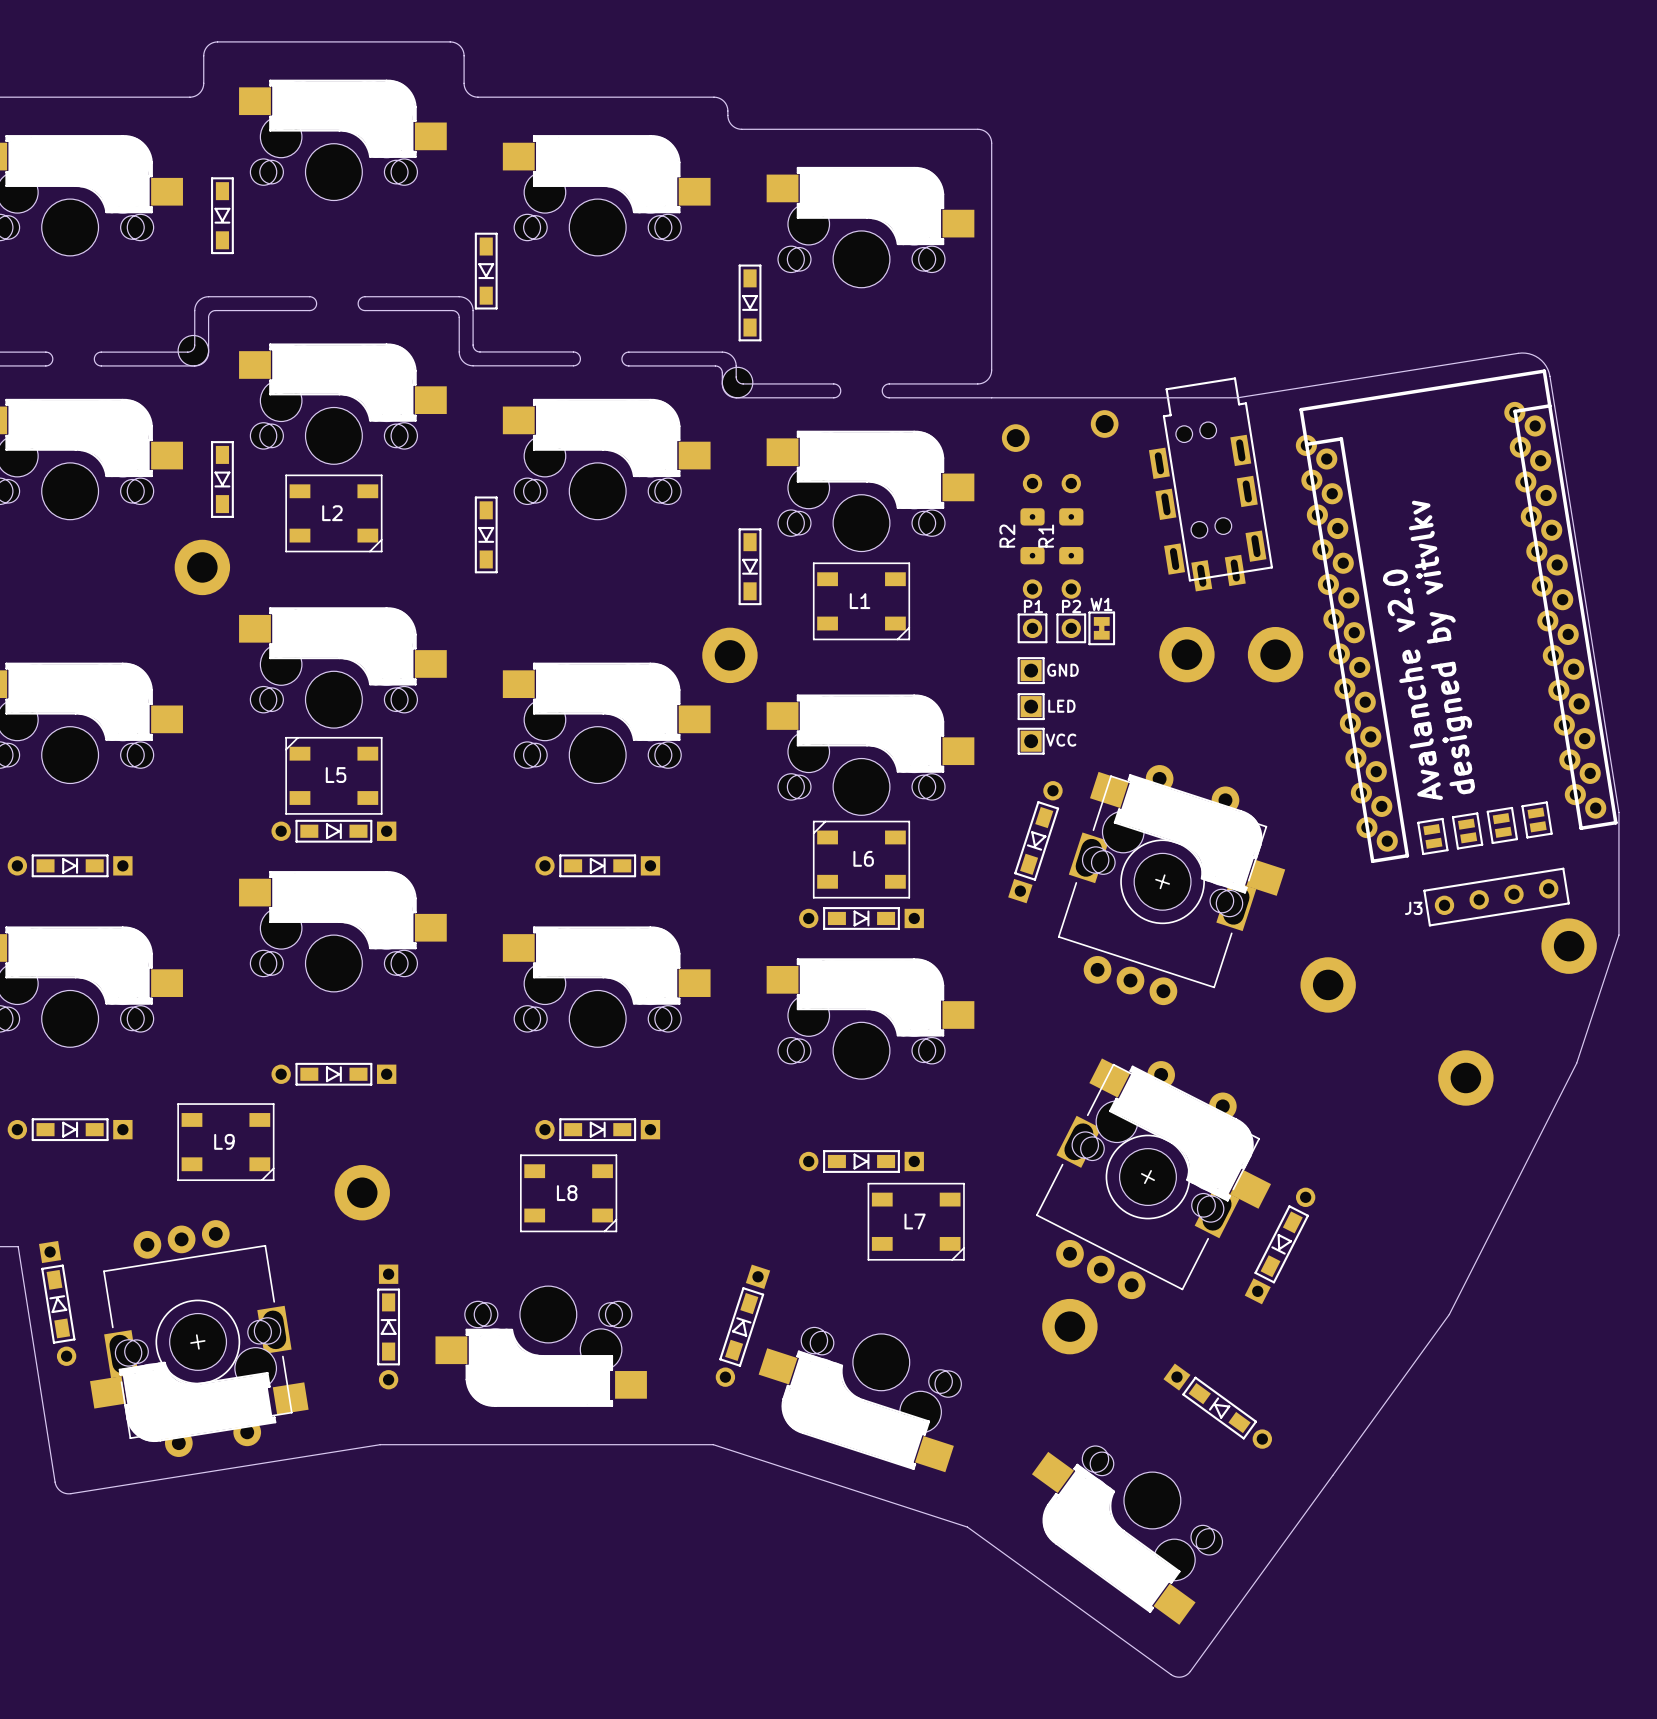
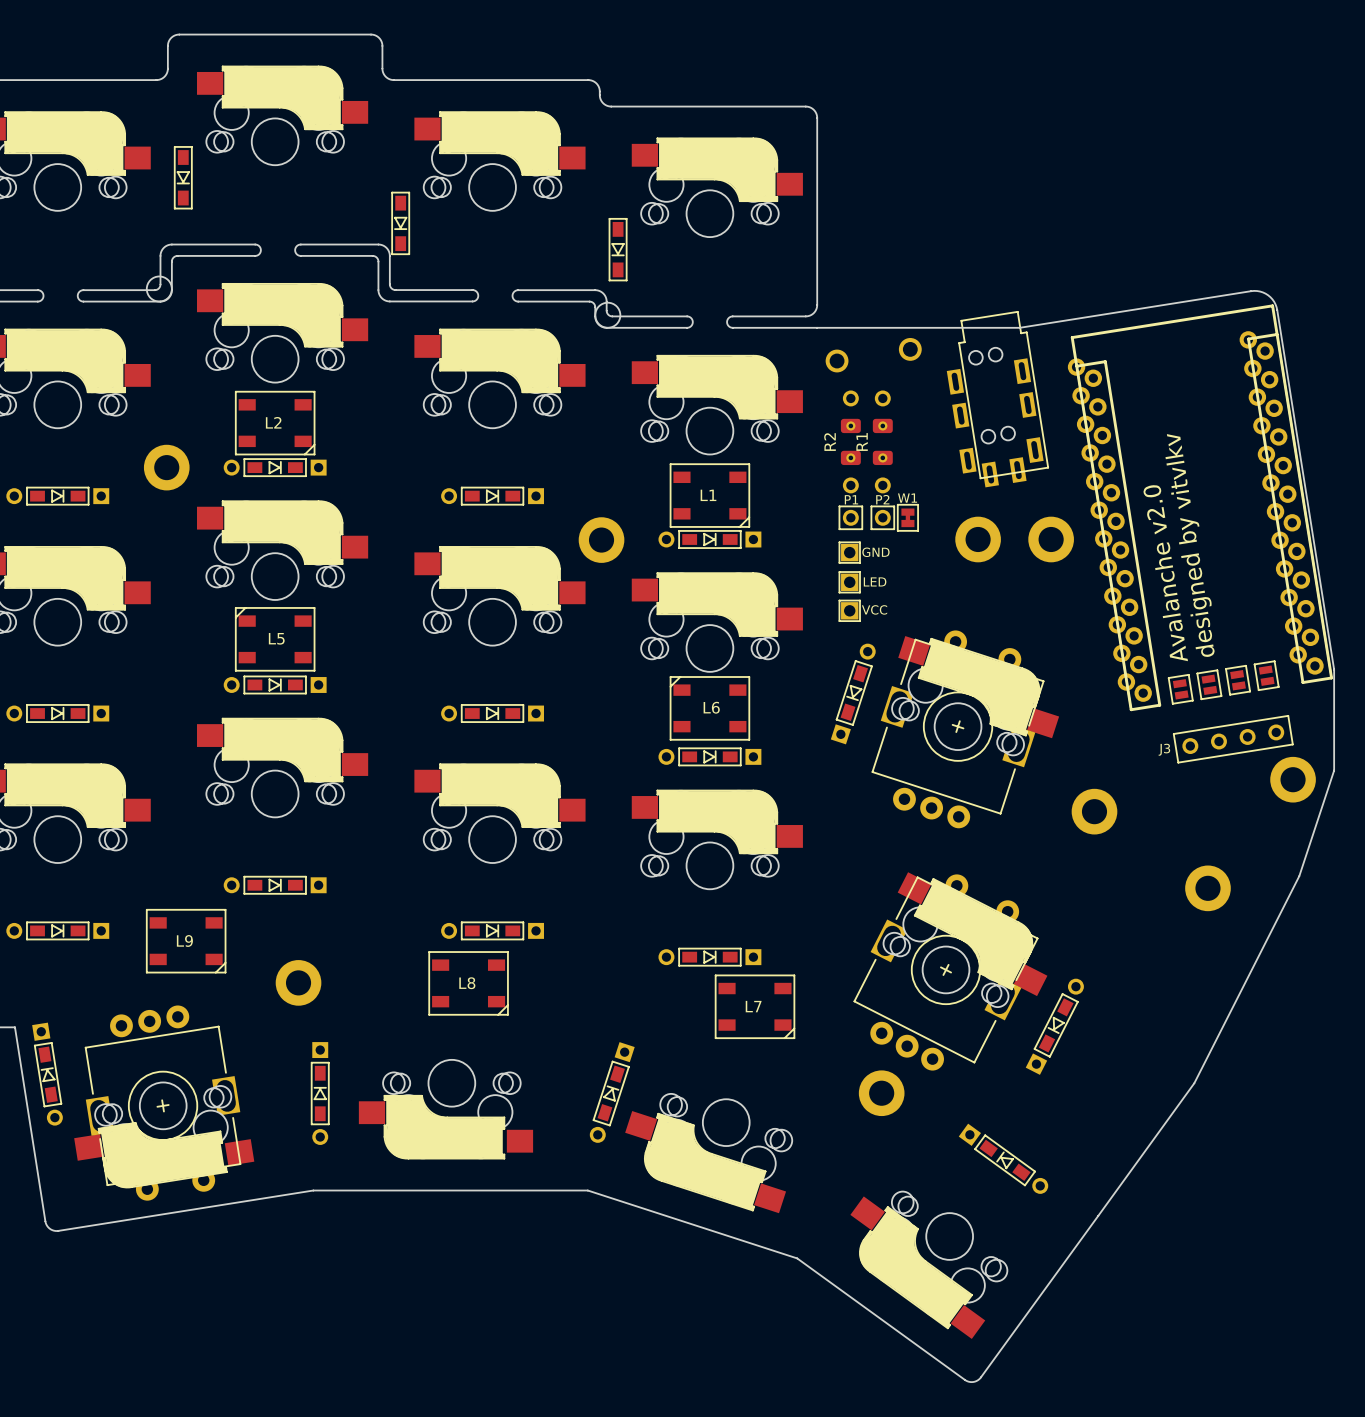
part: (222, 479) -> none
part: (486, 534) -> none
part: (750, 566) -> none
part: none -> (275, 467)
part: none -> (57, 496)
part: none -> (492, 496)
part: none -> (709, 539)

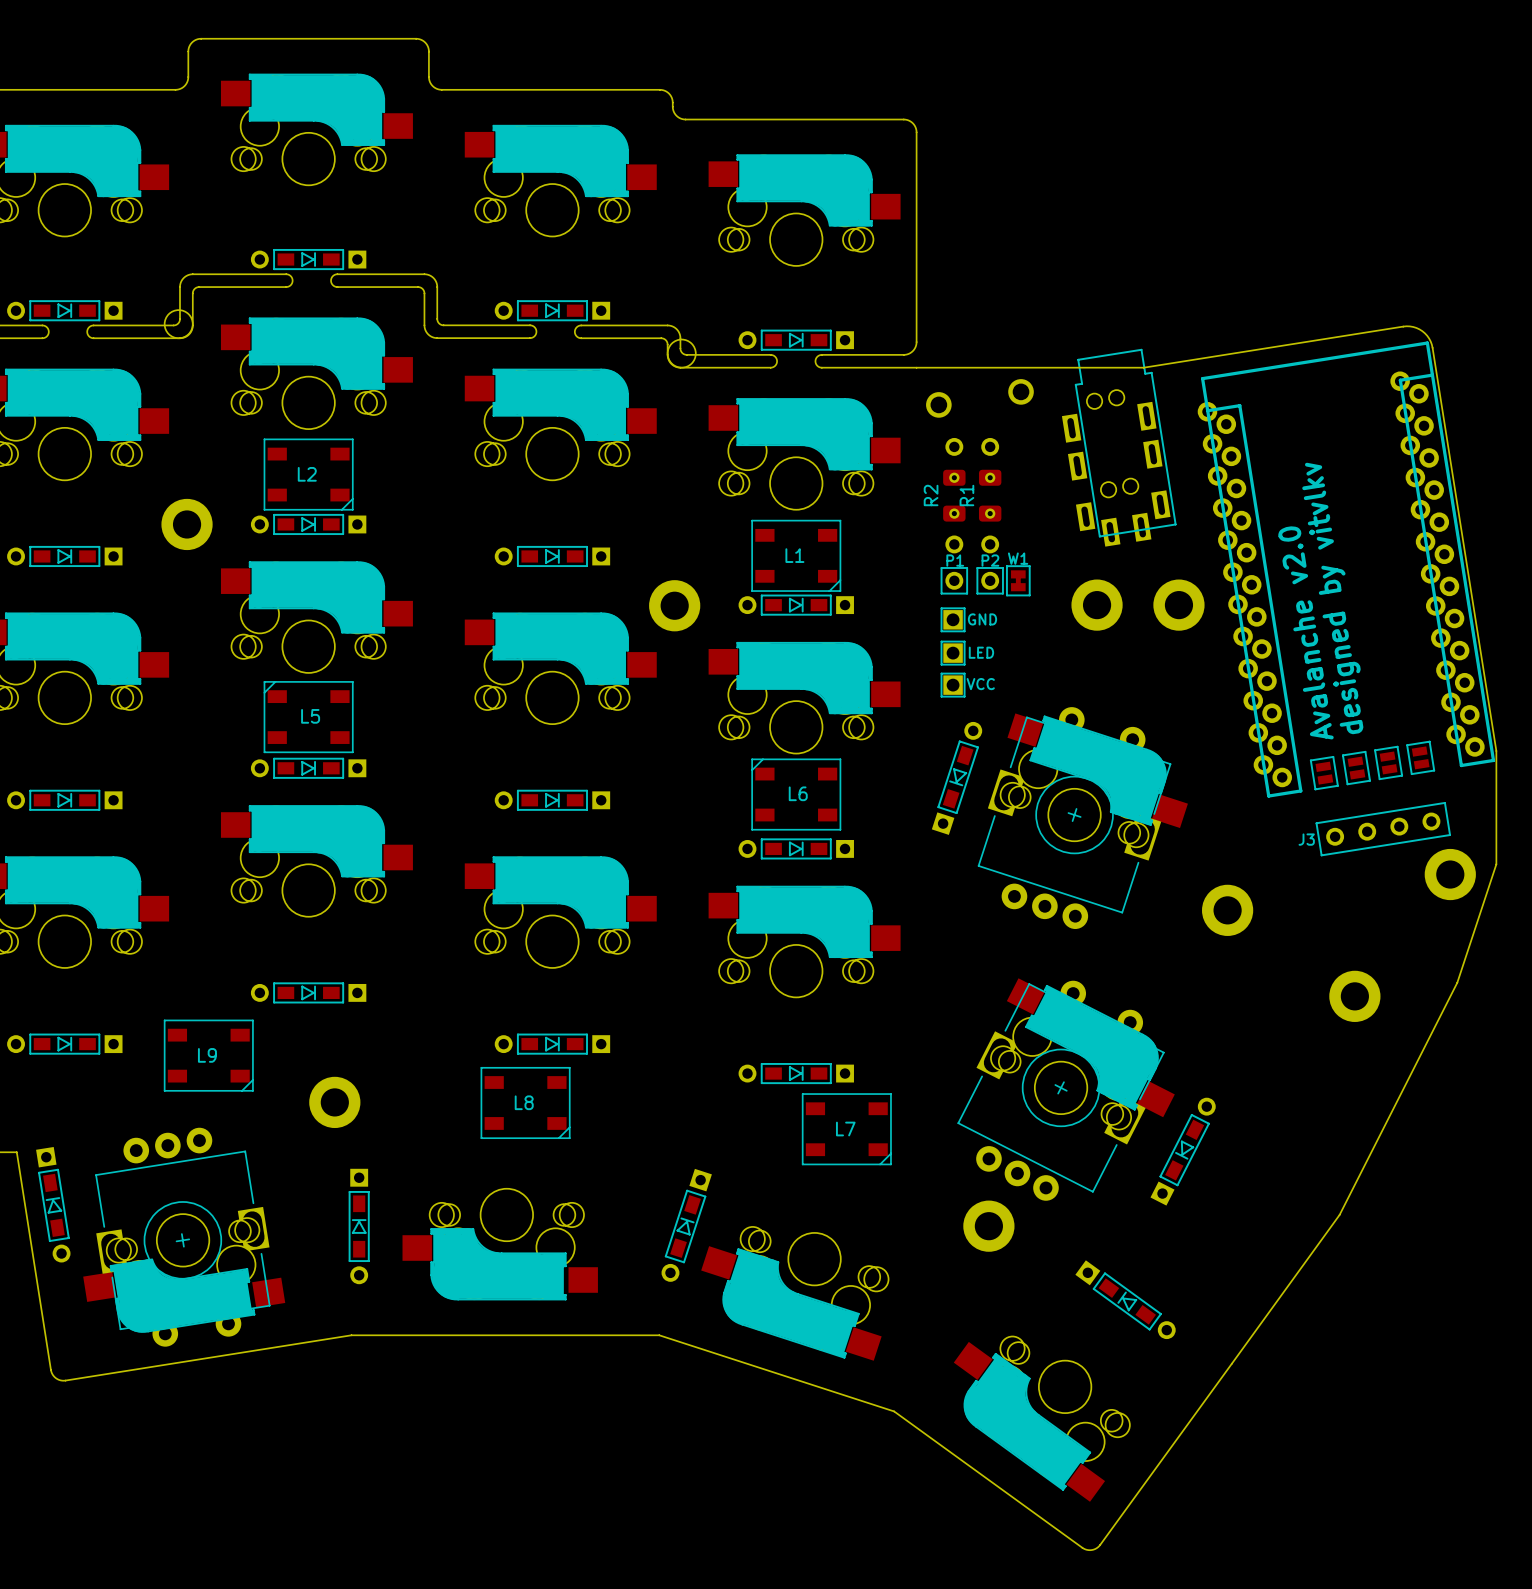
part: (183, 177) -> none
part: (400, 223) -> none
part: none -> (308, 259)
part: (618, 249) -> none
part: none -> (64, 310)
part: none -> (552, 310)
part: none -> (796, 340)

